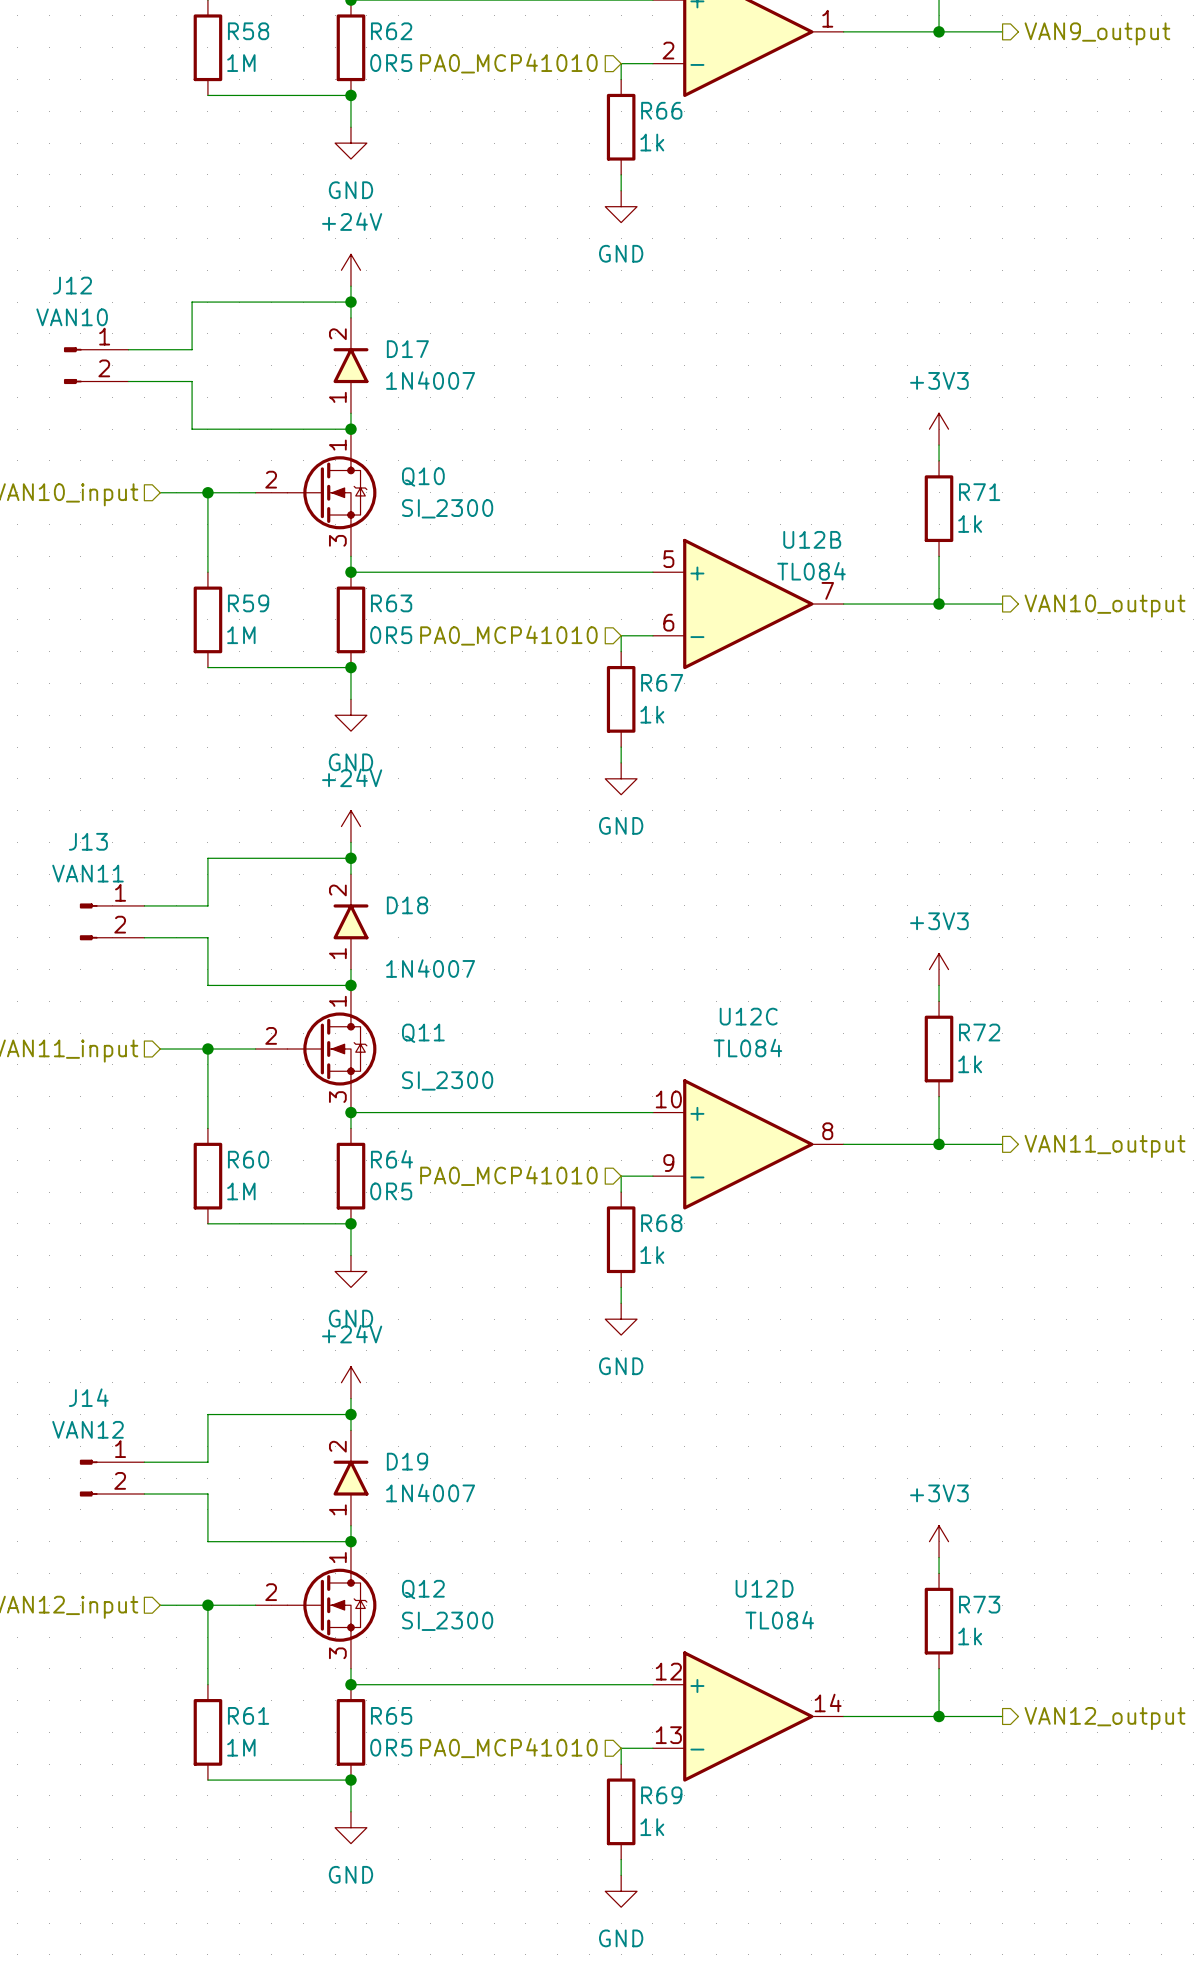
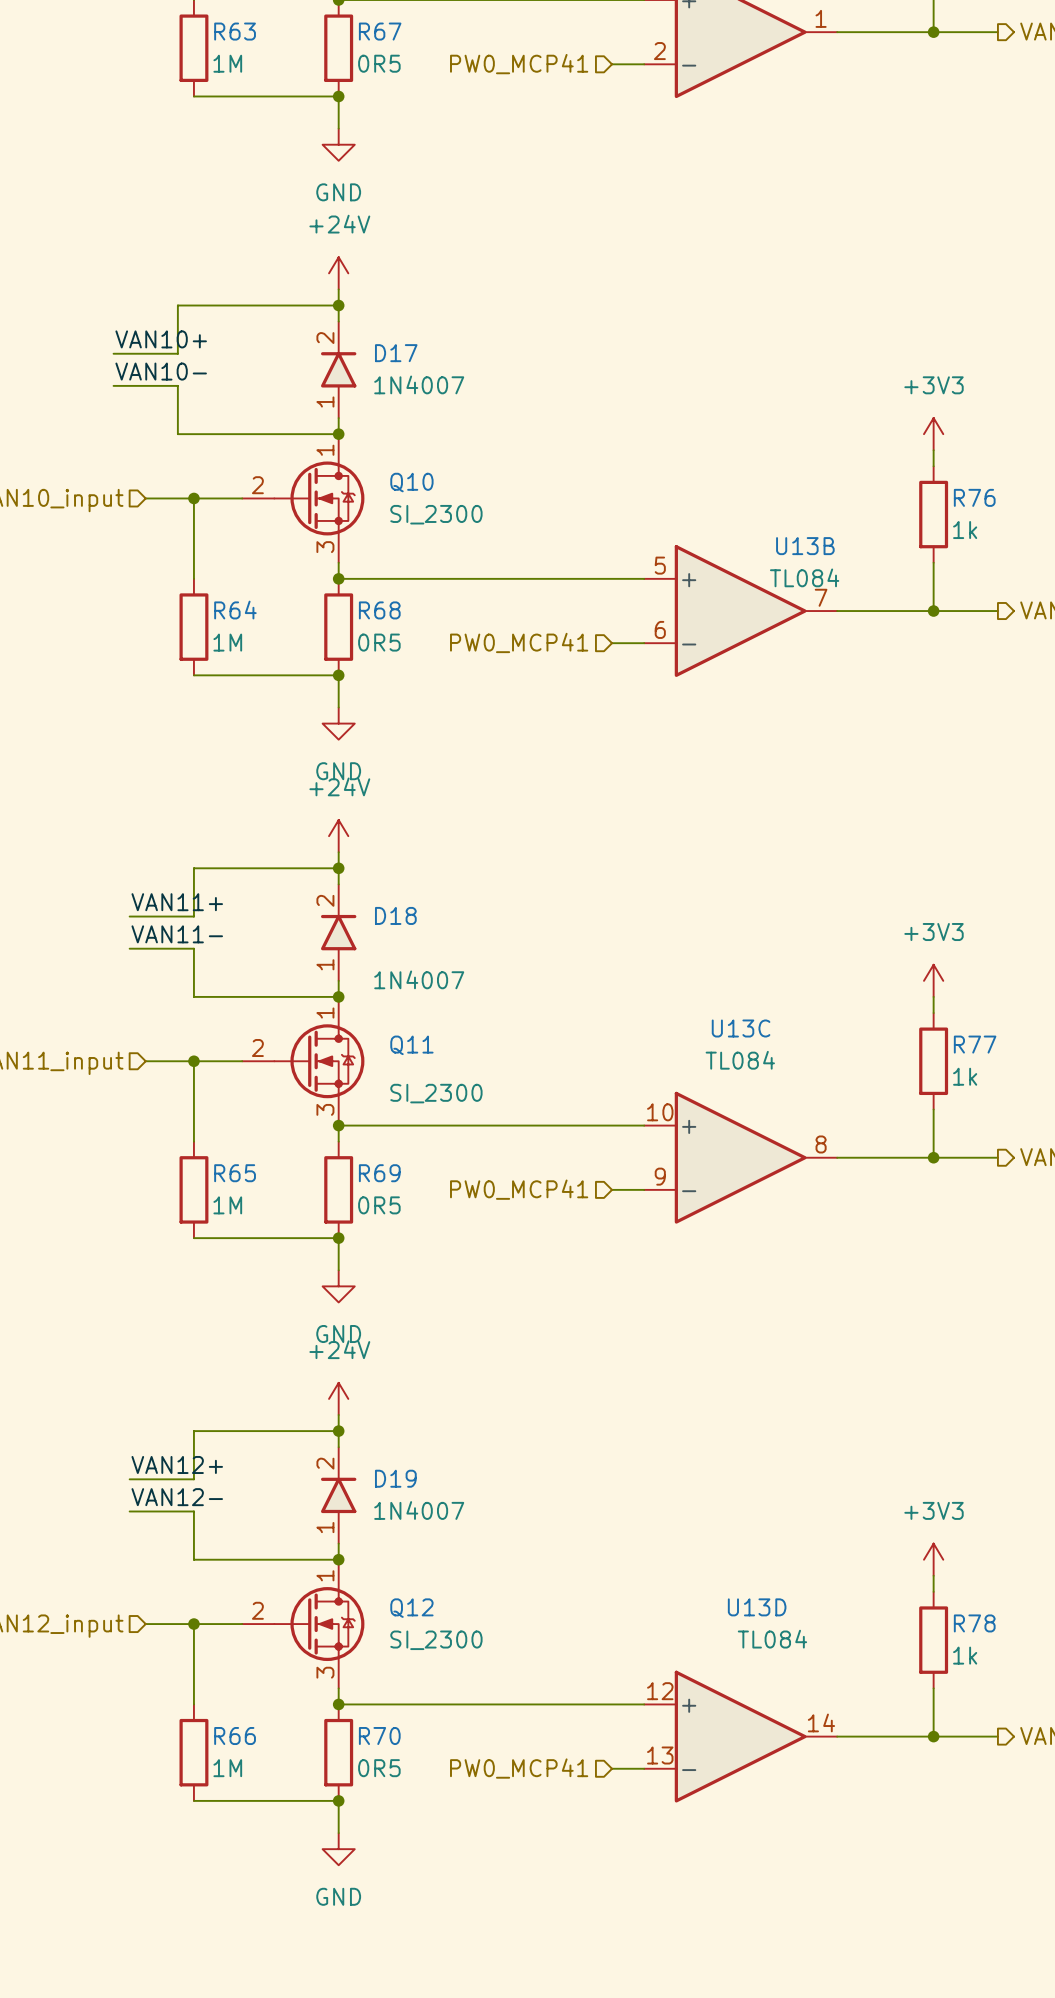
R58 name: R58 (248, 31) -> R63 (235, 31)
R62 name: R62 (391, 31) -> R67 (380, 31)
hierarchical label: PA0_MCP41010 (508, 63) -> PW0_MCP41 (519, 64)
wire: (621, 63) (621, 79) -> none
R66: 1k (621, 127) -> none
wire: (621, 174) (621, 190) -> none
power symbol: GND (621, 206) -> none
label: none -> VAN10+ (161, 339)
J12: VAN10 (96, 365) -> none
label: none -> VAN10- (161, 371)
R71 name: R71 (979, 492) -> R76 (974, 497)
U12B name: U12B (812, 539) -> U13B (805, 546)
R59 name: R59 (248, 603) -> R64 (235, 610)
R63 name: R63 (391, 603) -> R68 (379, 610)
hierarchical label: PA0_MCP41010 (508, 635) -> PW0_MCP41 (519, 642)
wire: (621, 635) (621, 651) -> none
R67: 1k (621, 699) -> none
wire: (621, 747) (621, 762) -> none
power symbol: GND (621, 778) -> none
label: none -> VAN11+ (177, 902)
J13: VAN11 (112, 921) -> none
label: none -> VAN11- (177, 934)
U12C name: U12C (748, 1016) -> U13C (741, 1028)
R72 name: R72 (979, 1032) -> R77 (975, 1044)
R60 name: R60 (248, 1159) -> R65 (235, 1173)
R64 name: R64 (391, 1159) -> R69 (379, 1173)
hierarchical label: PA0_MCP41010 (508, 1175) -> PW0_MCP41 (519, 1189)
wire: (621, 1176) (621, 1192) -> none
R68: 1k (621, 1239) -> none
wire: (621, 1287) (621, 1303) -> none
power symbol: GND (621, 1319) -> none
label: none -> VAN12+ (177, 1464)
J14: VAN12 (112, 1478) -> none
label: none -> VAN12- (177, 1497)
U12D name: U12D (764, 1588) -> U13D (757, 1607)
R73 name: R73 (979, 1604) -> R78 (974, 1623)
R61 name: R61 (248, 1715) -> R66 (235, 1736)
R65 name: R65 (391, 1715) -> R70 (379, 1736)
hierarchical label: PA0_MCP41010 (508, 1748) -> PW0_MCP41 (519, 1768)
wire: (621, 1748) (621, 1764) -> none
R69: 1k (621, 1811) -> none
wire: (621, 1859) (621, 1875) -> none
power symbol: GND (621, 1891) -> none

